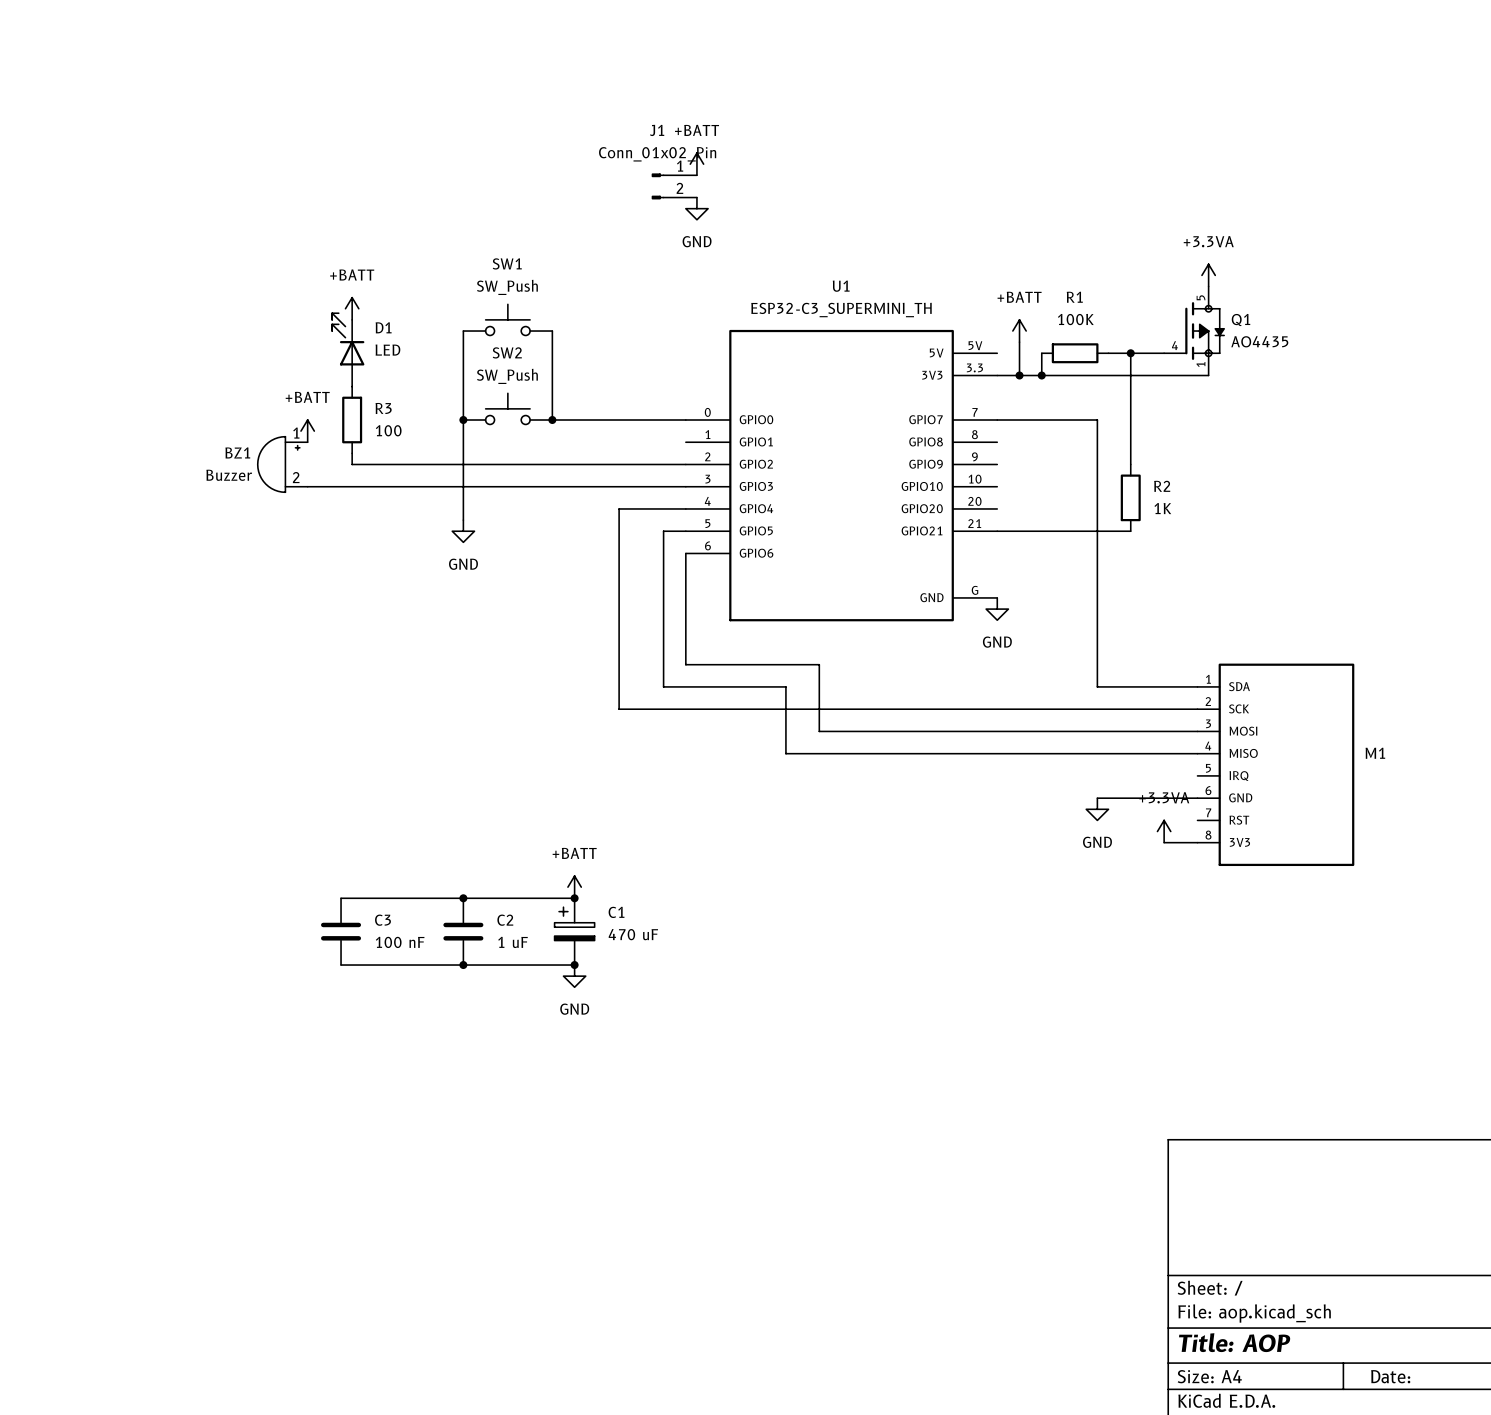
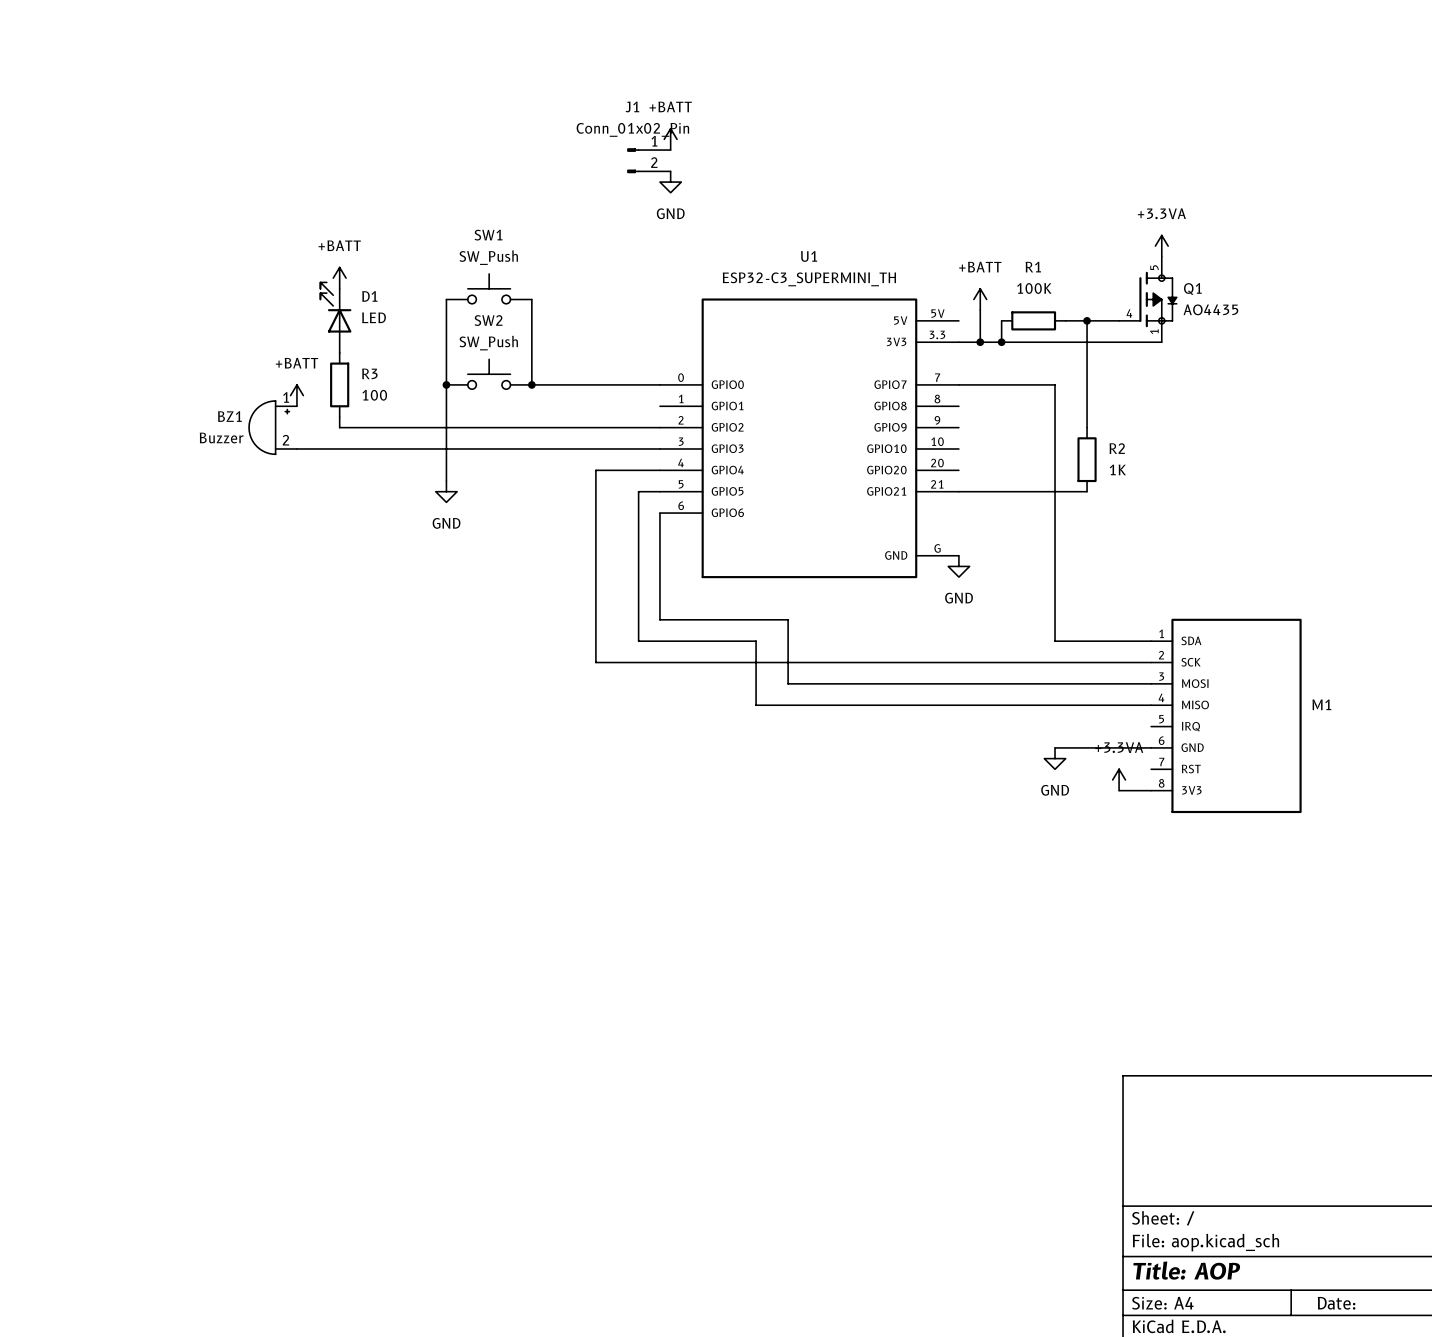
power symbol: +BATT (574, 887) -> none
wire: (341, 898) (574, 898) -> none
junction: (463, 898) -> none
junction: (574, 898) -> none
C3: 100 nF (341, 931) -> none
C2: 1 uF (463, 931) -> none
C1: 470 uF (574, 931) -> none
wire: (341, 965) (574, 965) -> none
junction: (463, 965) -> none
junction: (574, 965) -> none
power symbol: GND (574, 976) -> none

